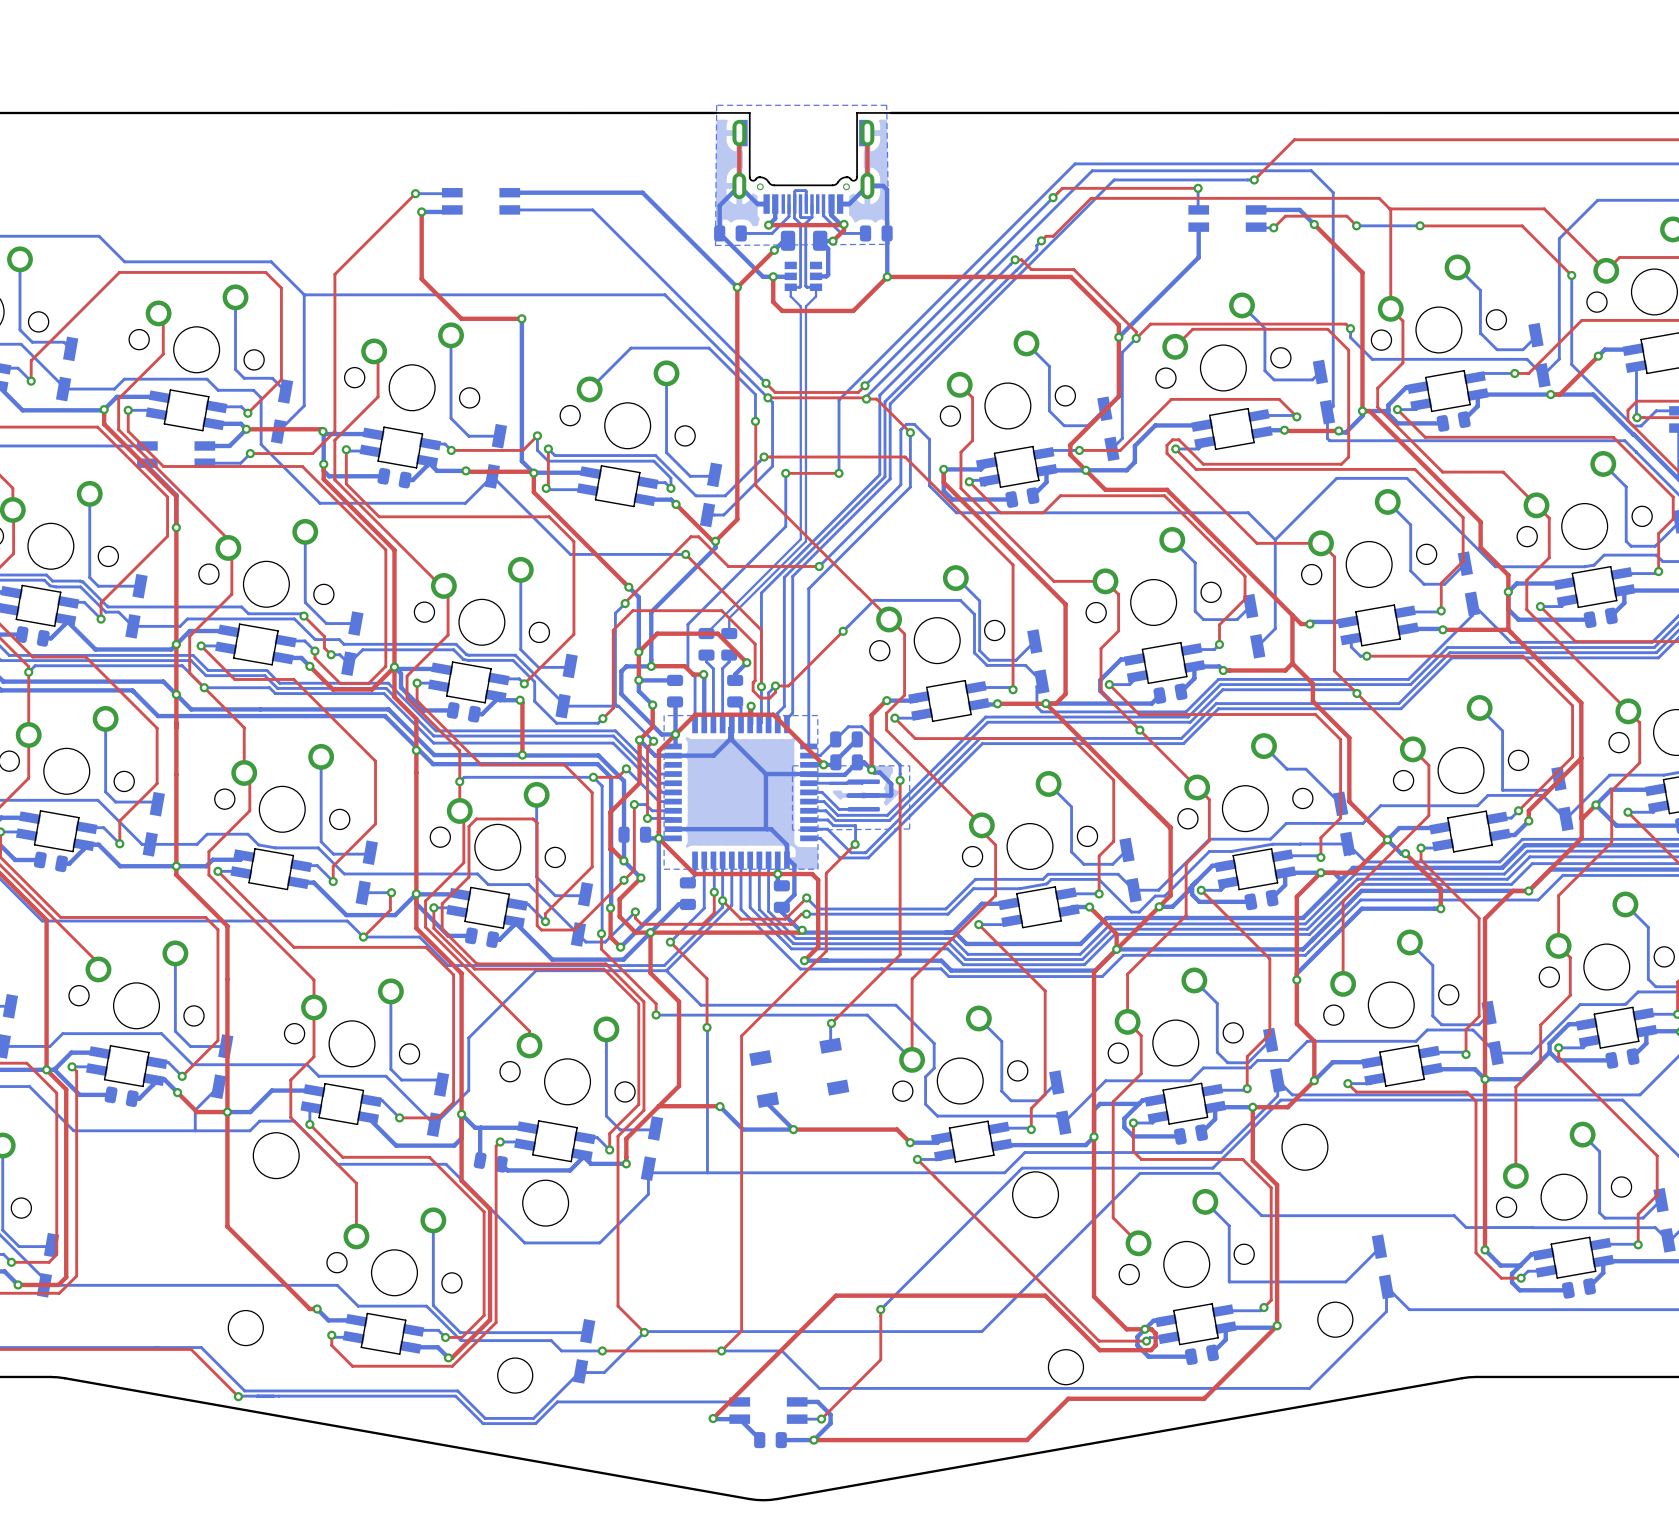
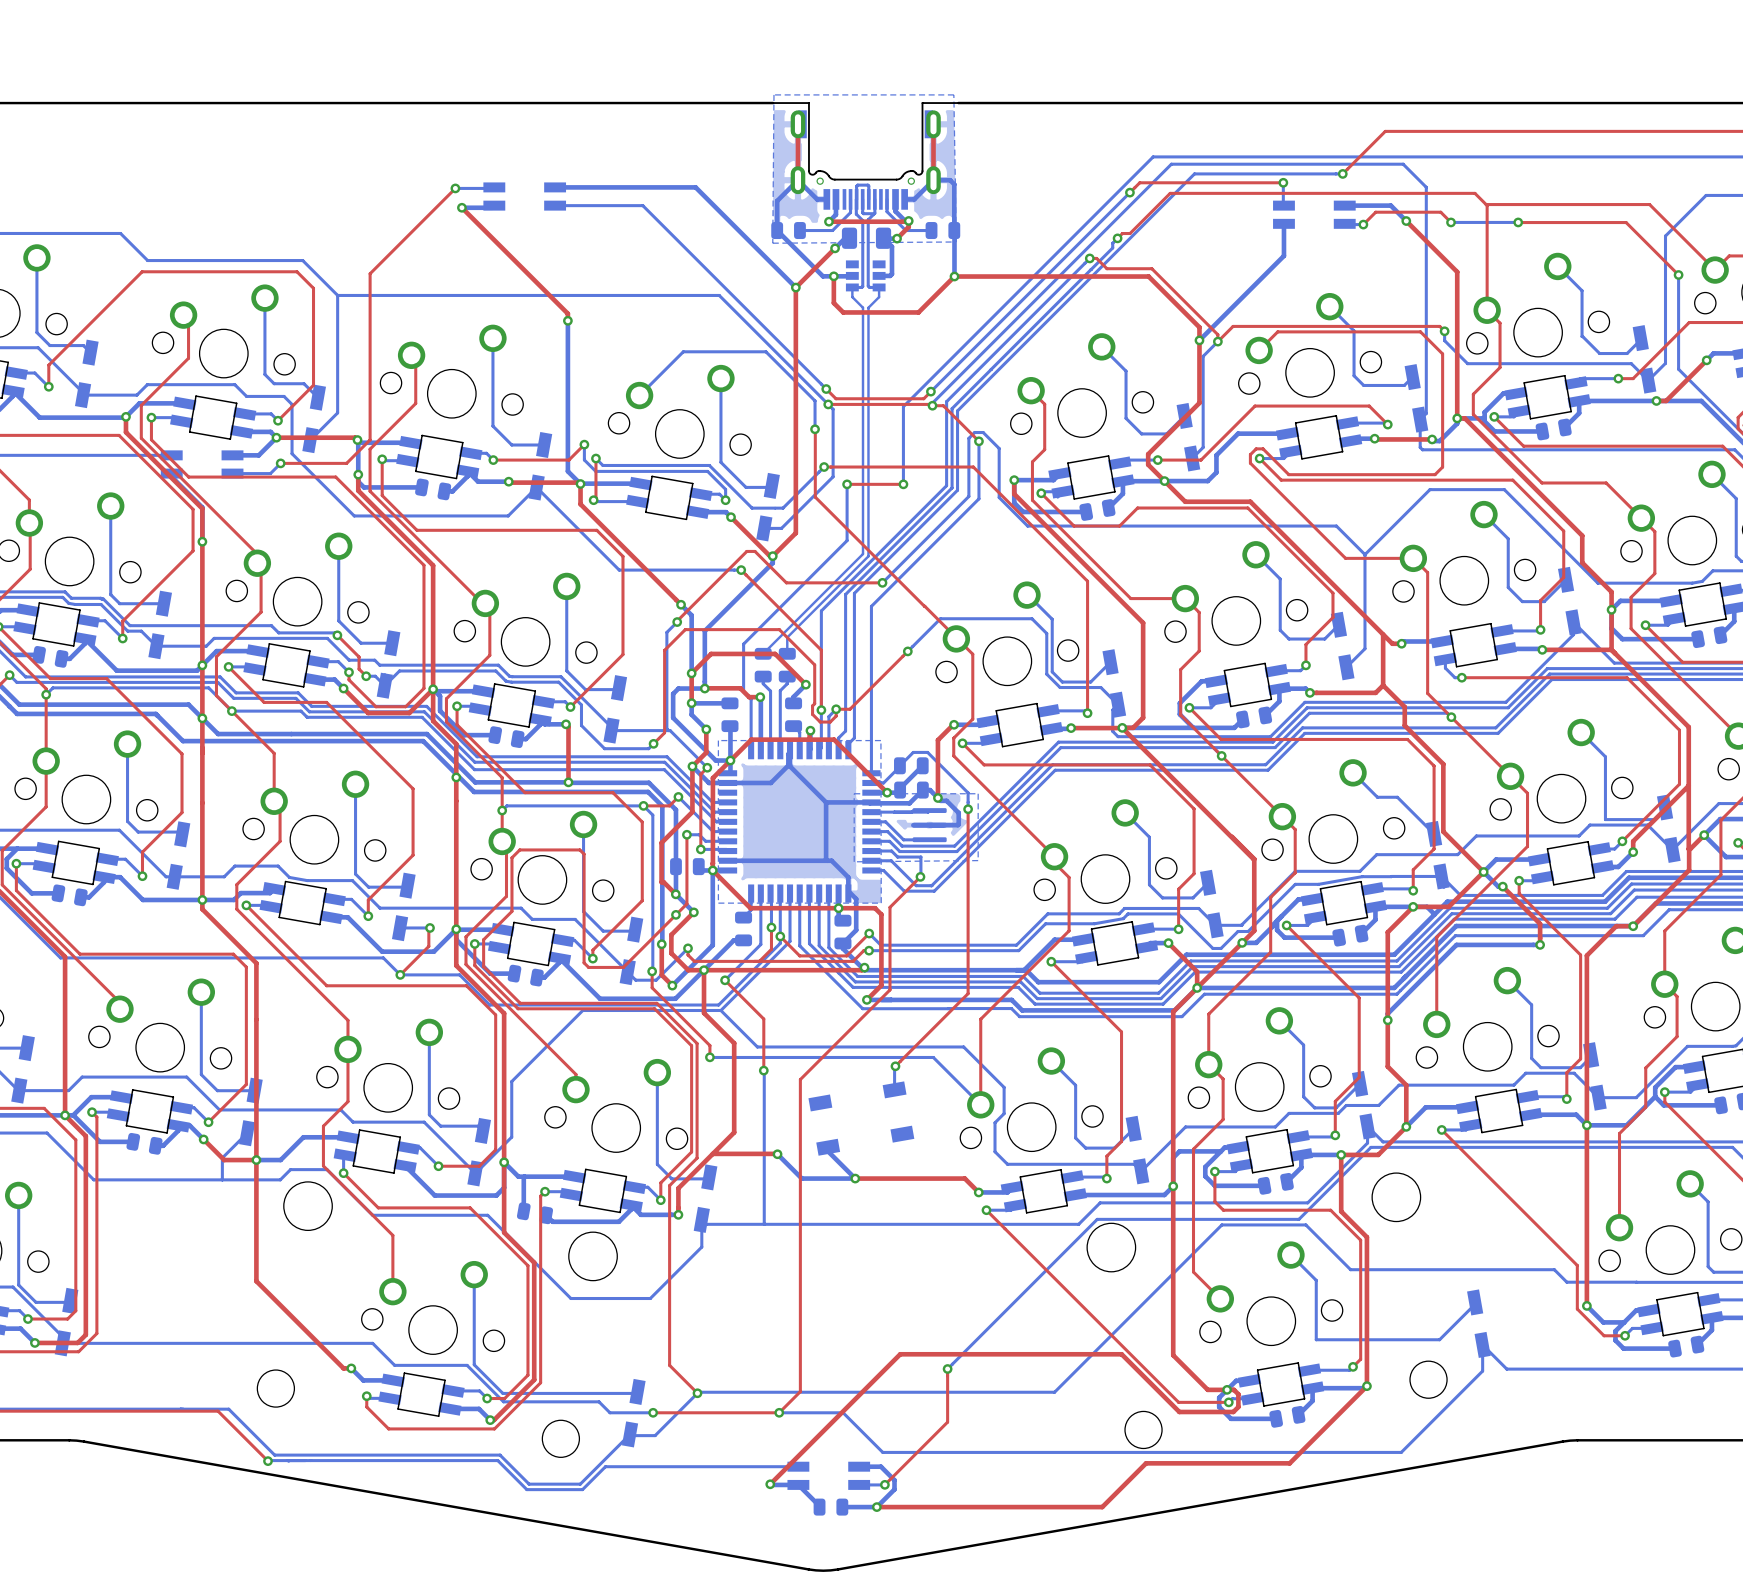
top track: (421, 211) (421, 279) (461, 318) (521, 318) -> (461, 207) (567, 313) (567, 320)
top track: (1356, 1092) (1466, 1092) (1476, 1101) (1476, 1211) -> (1450, 1138) (1577, 1265)

